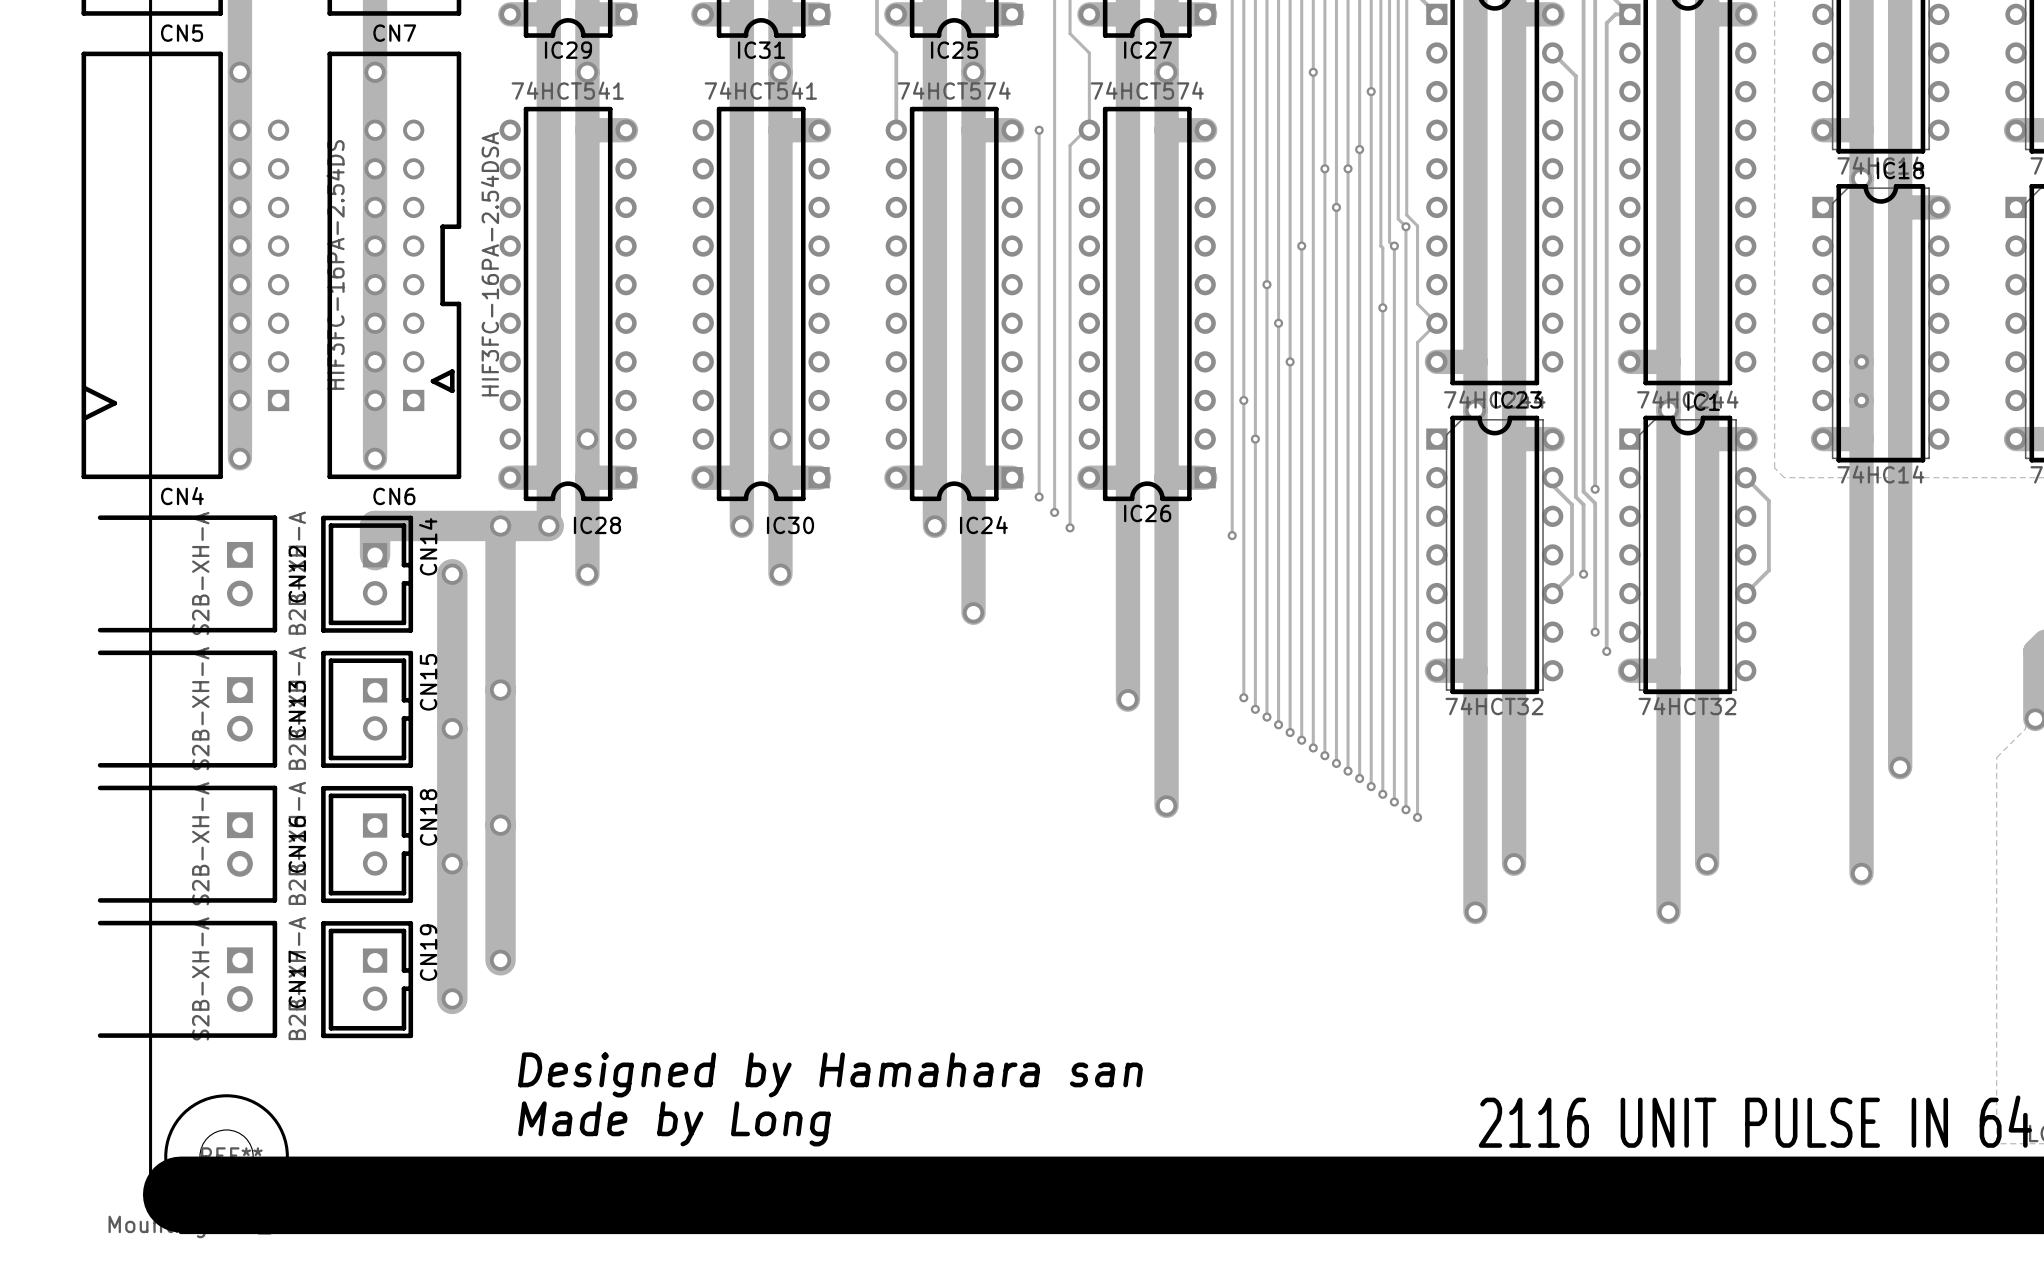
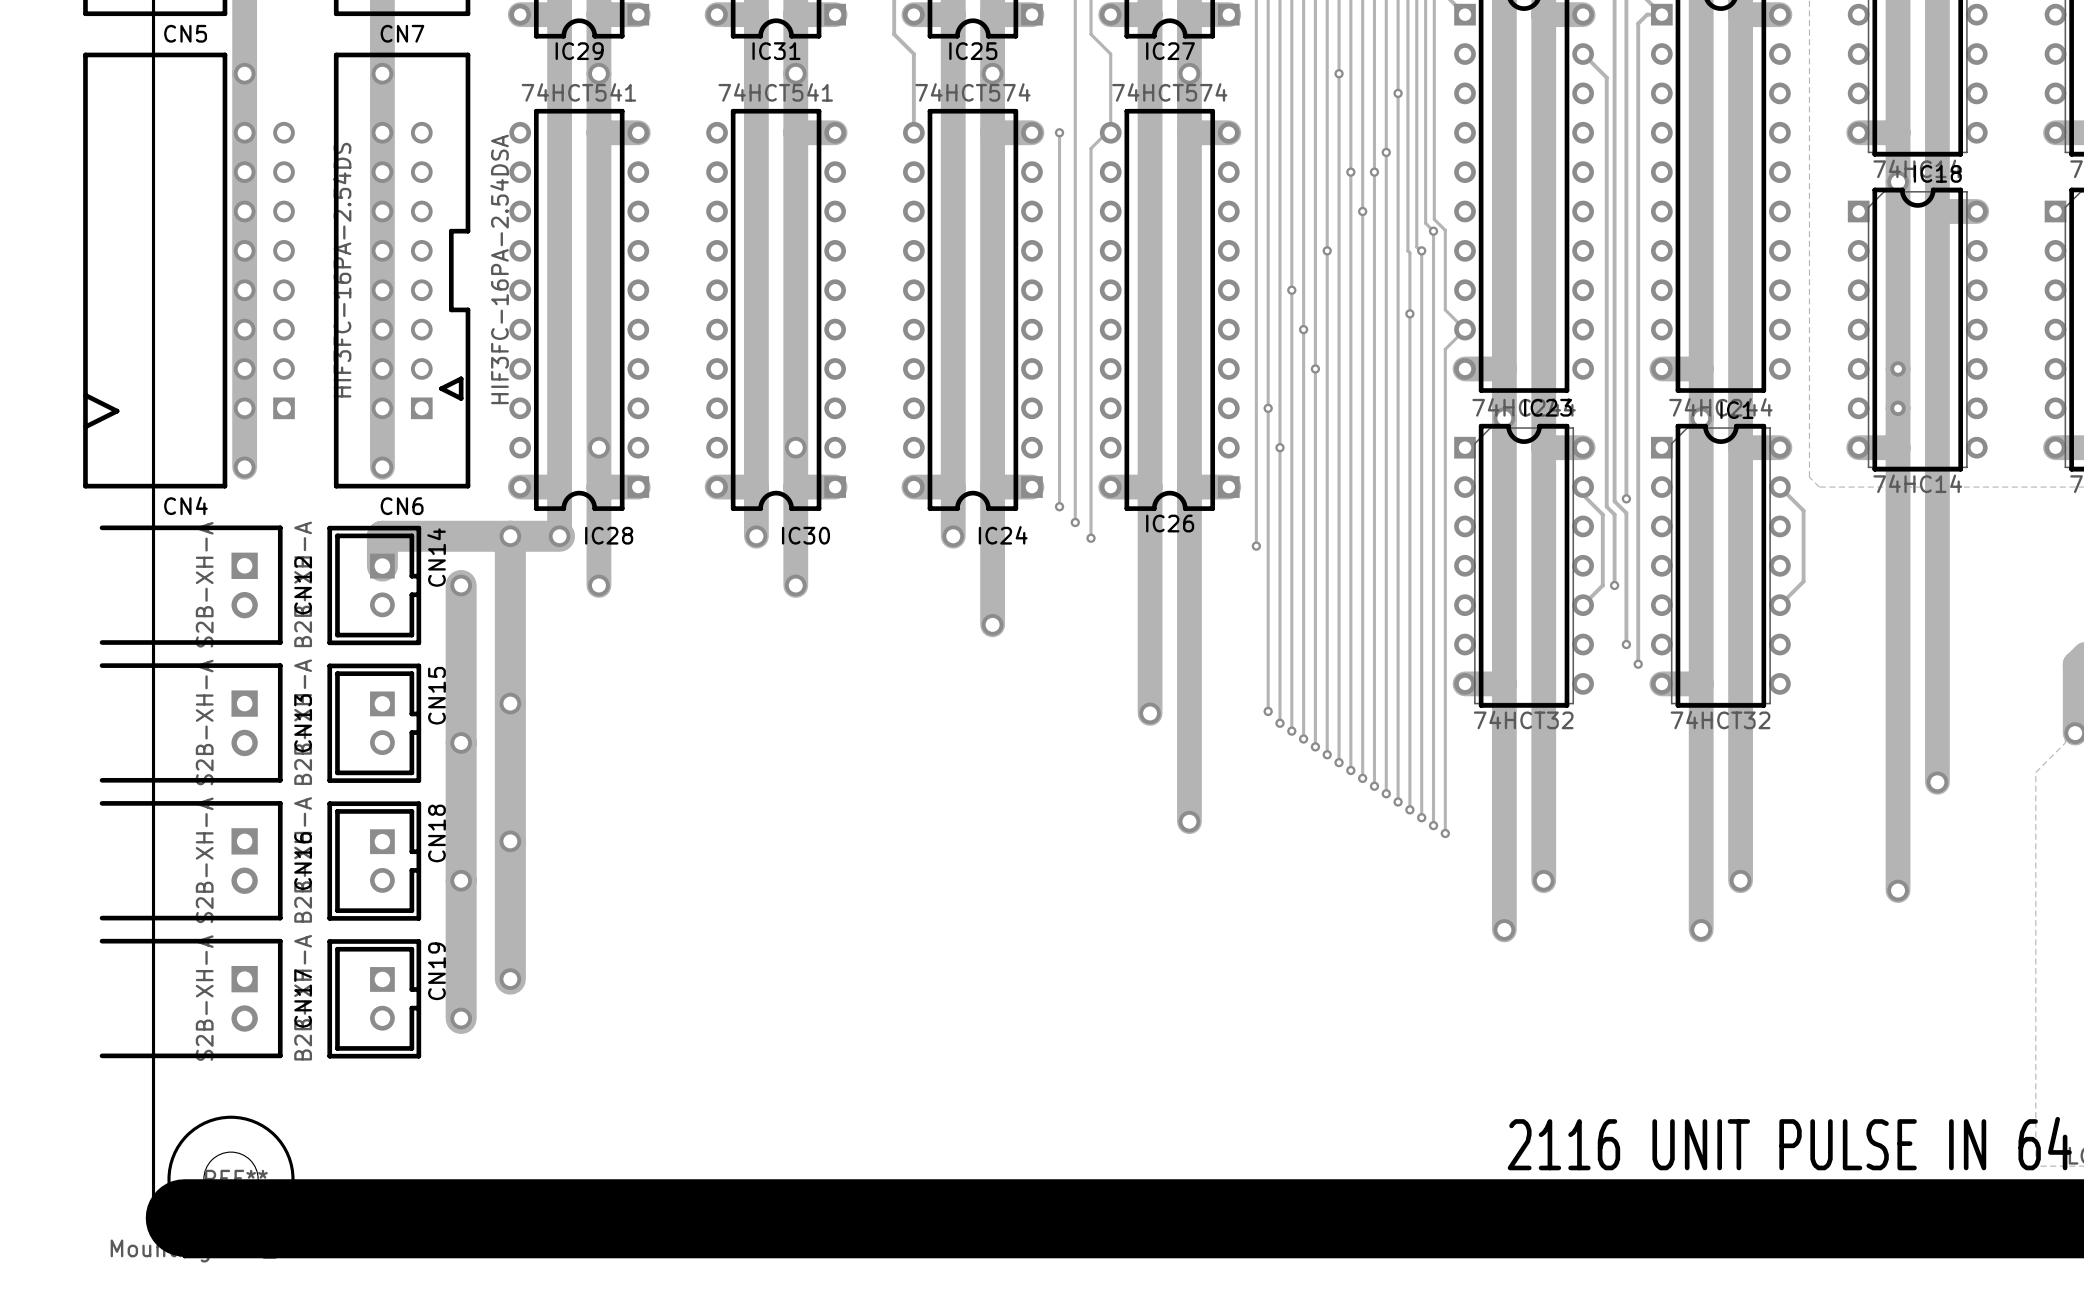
text: Designed by Hamahara san (830, 1074) -> none
text: Made by Long (674, 1123) -> none

